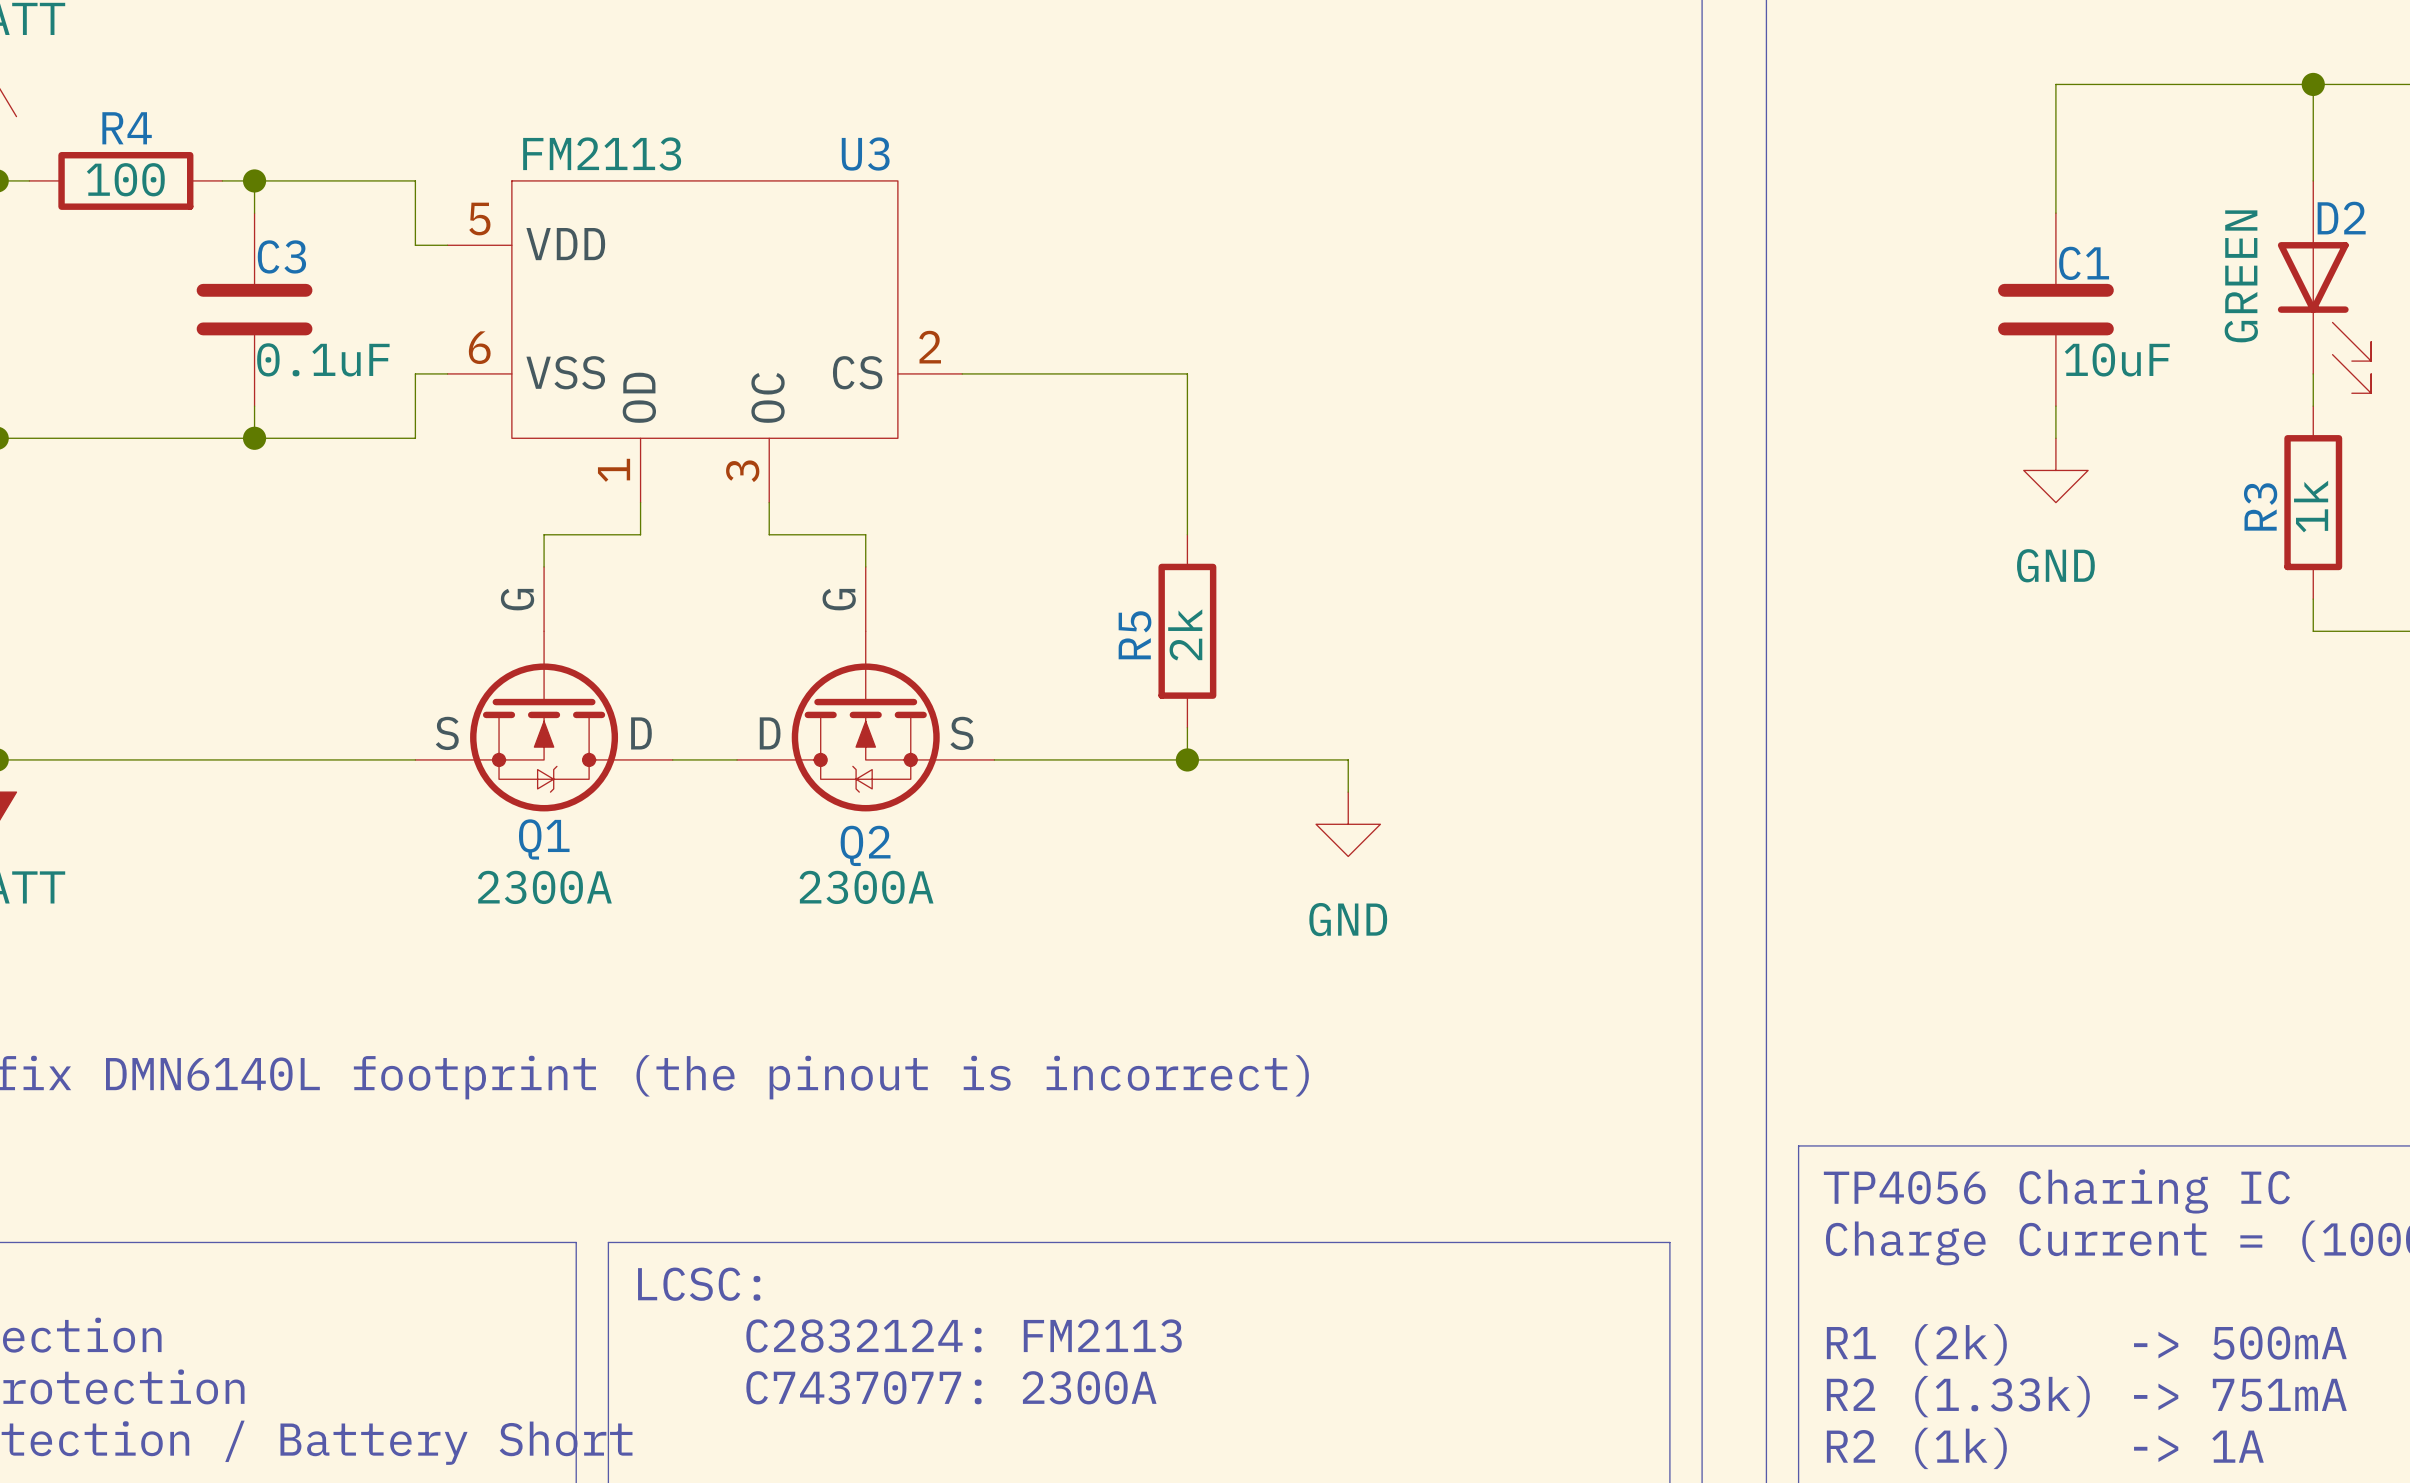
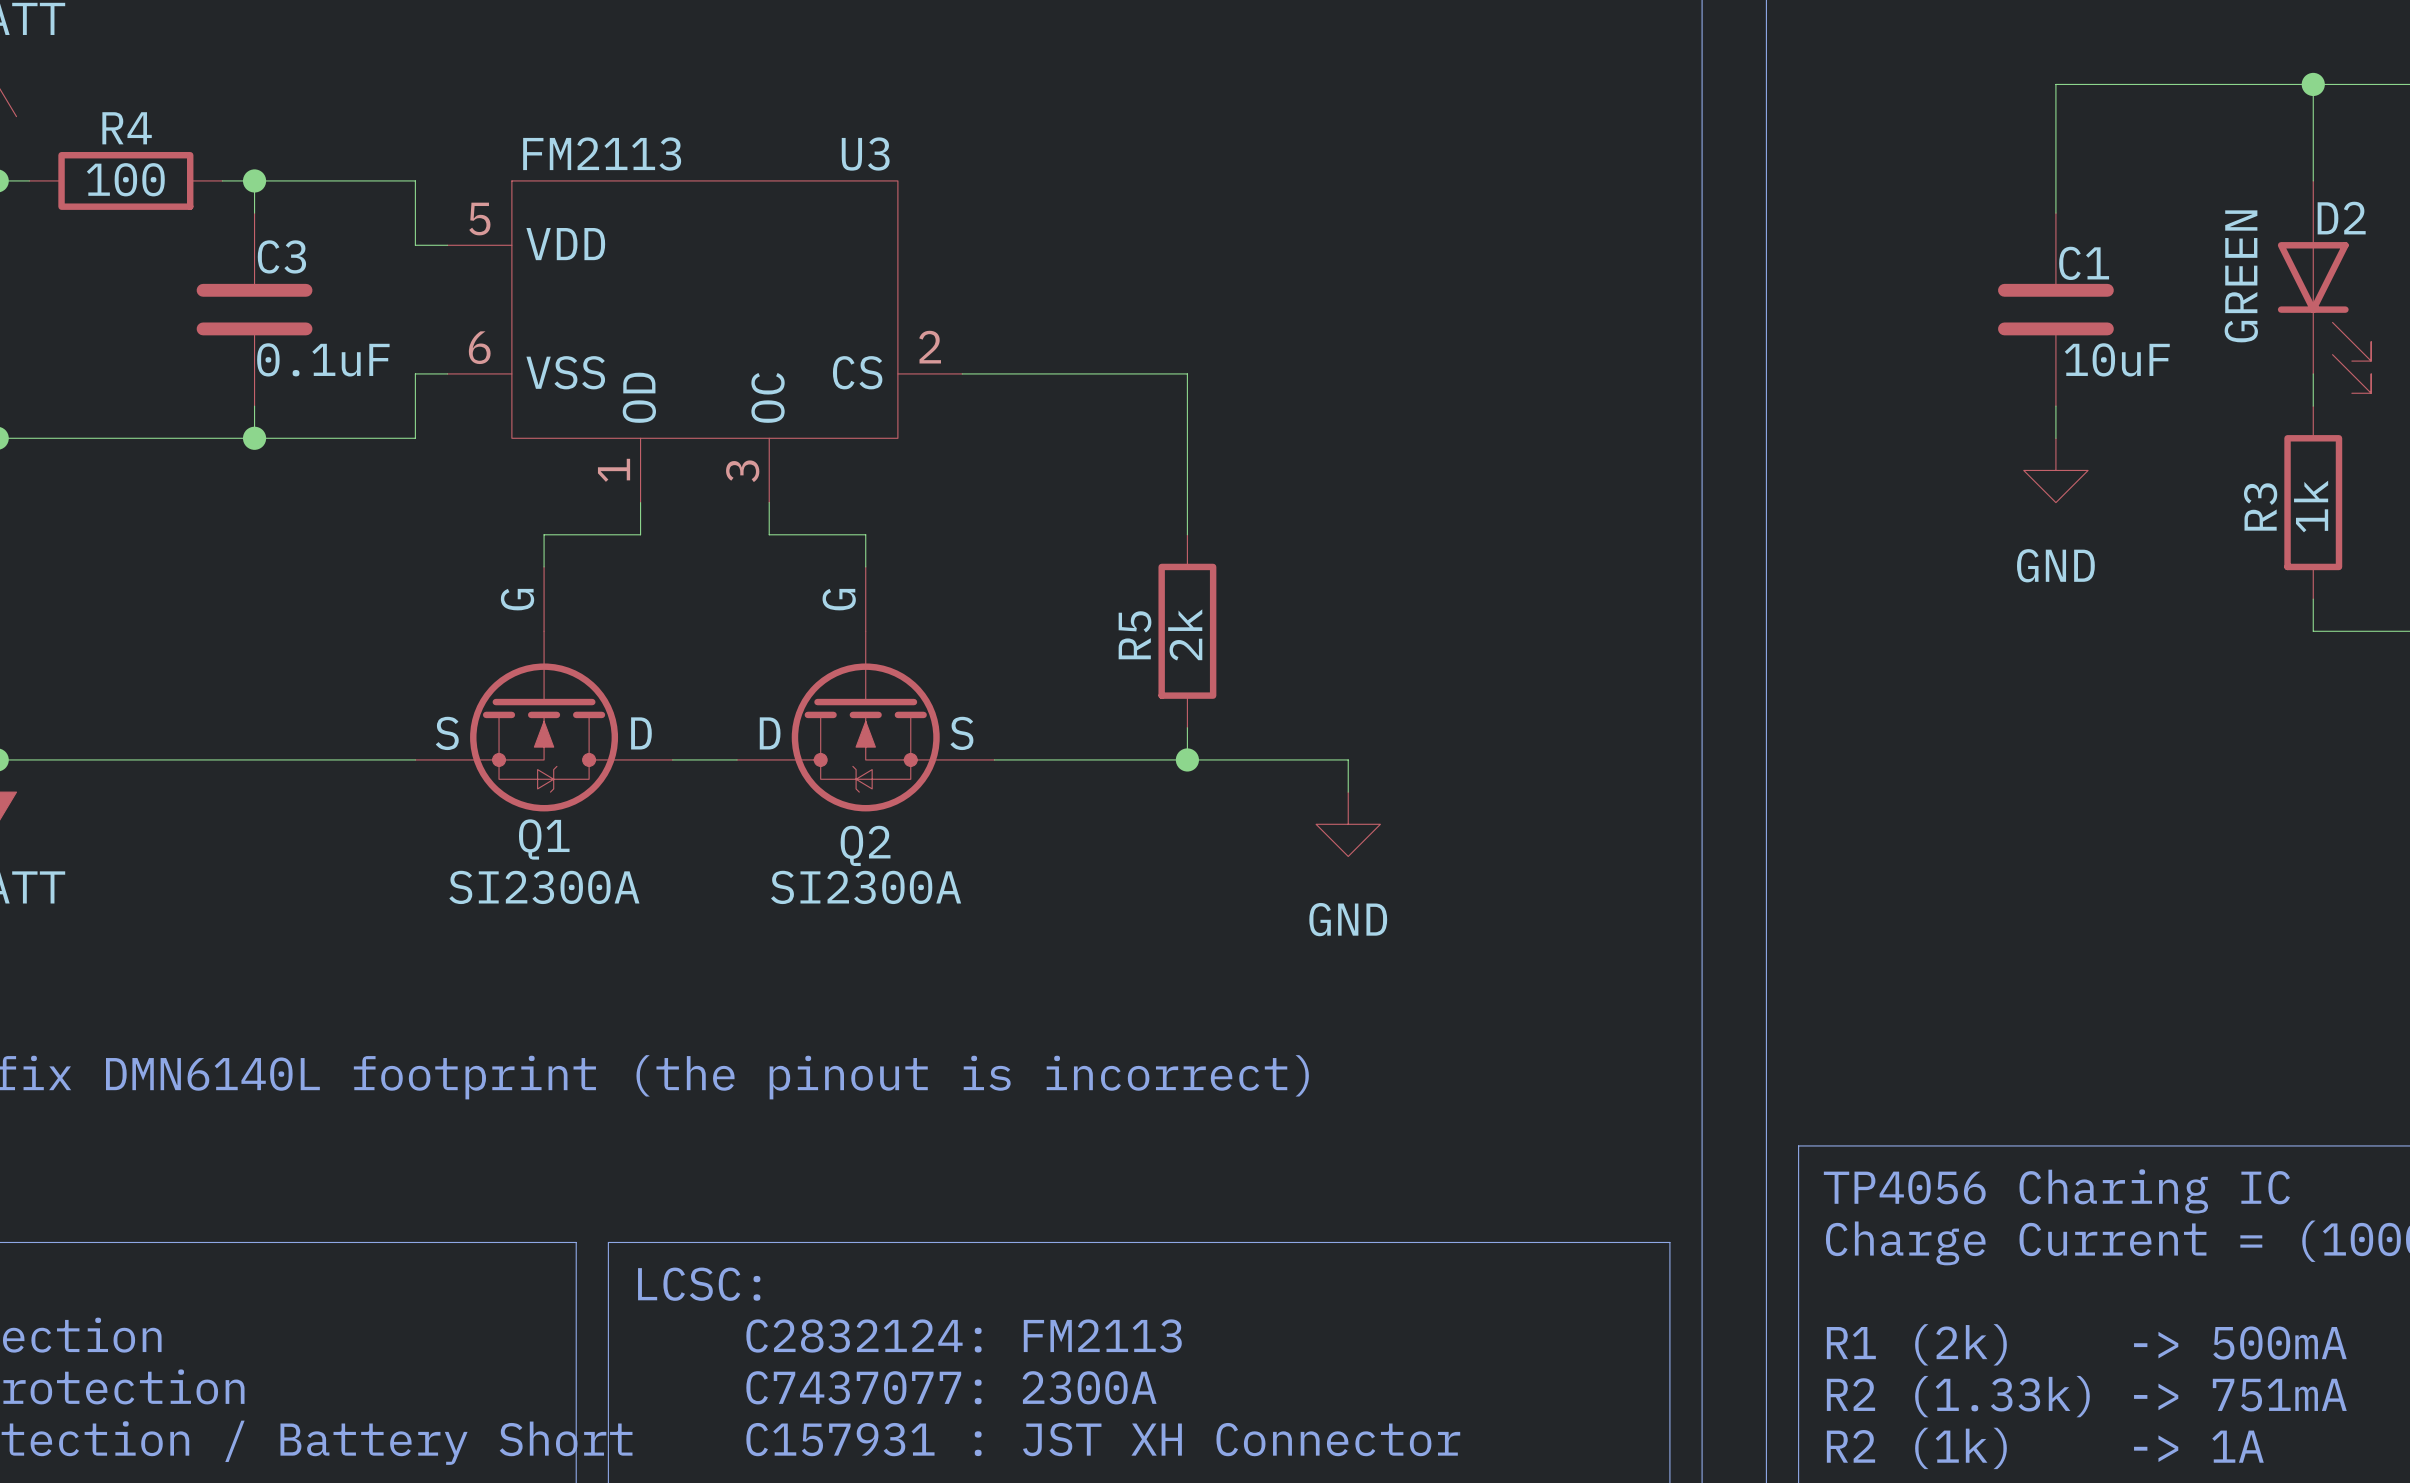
Q1 value: 2300A (544, 887) -> SI2300A (544, 887)
Q2 value: 2300A (866, 887) -> SI2300A (866, 887)
text: none -> C157931 : JST XH Connector (1103, 1439)

